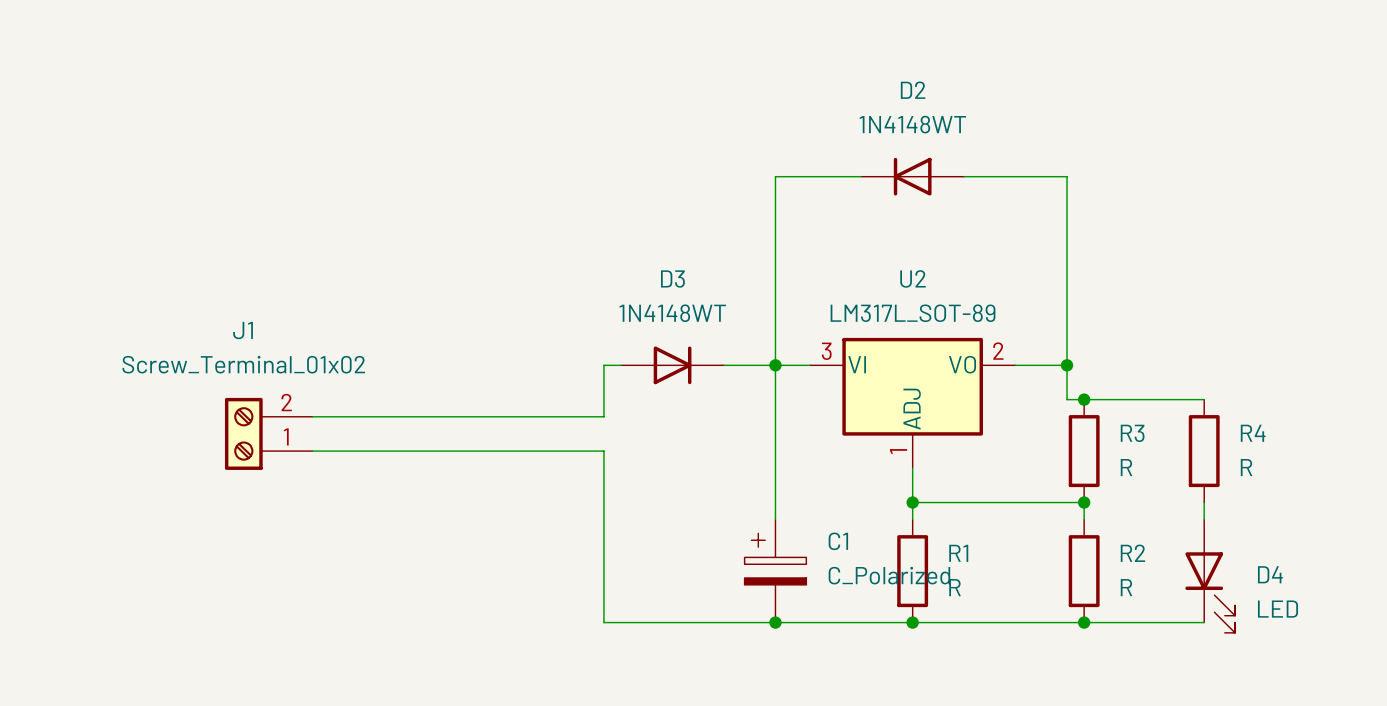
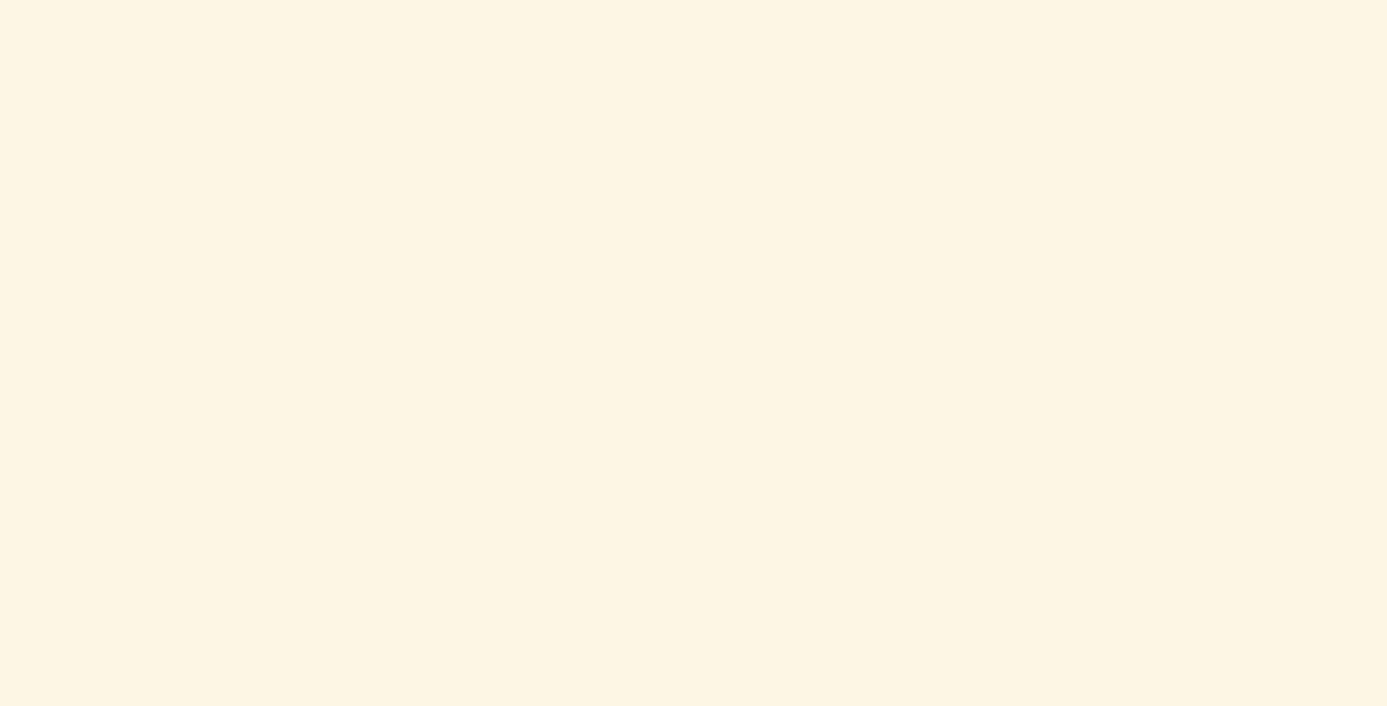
wire: (861, 176) (775, 176) (775, 519) -> none
D2: 1N4148WT (912, 176) -> none
wire: (964, 176) (1067, 176) (1067, 399) (1204, 399) -> none
wire: (621, 365) (603, 365) (603, 416) (312, 416) -> none
D3: 1N4148WT (672, 365) -> none
wire: (724, 365) (809, 365) -> none
junction: (775, 365) -> none
wire: (1015, 365) (1067, 365) -> none
junction: (1067, 365) -> none
junction: (1084, 399) -> none
U2: LM317L_SOT-89 (912, 403) -> none
J1: Screw_Terminal_01x02 (268, 433) -> none
wire: (312, 451) (603, 451) (603, 622) (1204, 622) -> none
R3: R (1084, 451) -> none
R4: R (1204, 451) -> none
wire: (912, 468) (912, 519) -> none
wire: (912, 502) (1084, 502) (1084, 519) -> none
junction: (912, 502) -> none
junction: (1084, 502) -> none
wire: (1204, 502) (1204, 519) -> none
C1: C_Polarized (775, 571) -> none
R1: R (912, 571) -> none
R2: R (1084, 571) -> none
D4: LED (1210, 576) -> none
junction: (775, 622) -> none
junction: (912, 622) -> none
junction: (1084, 622) -> none

